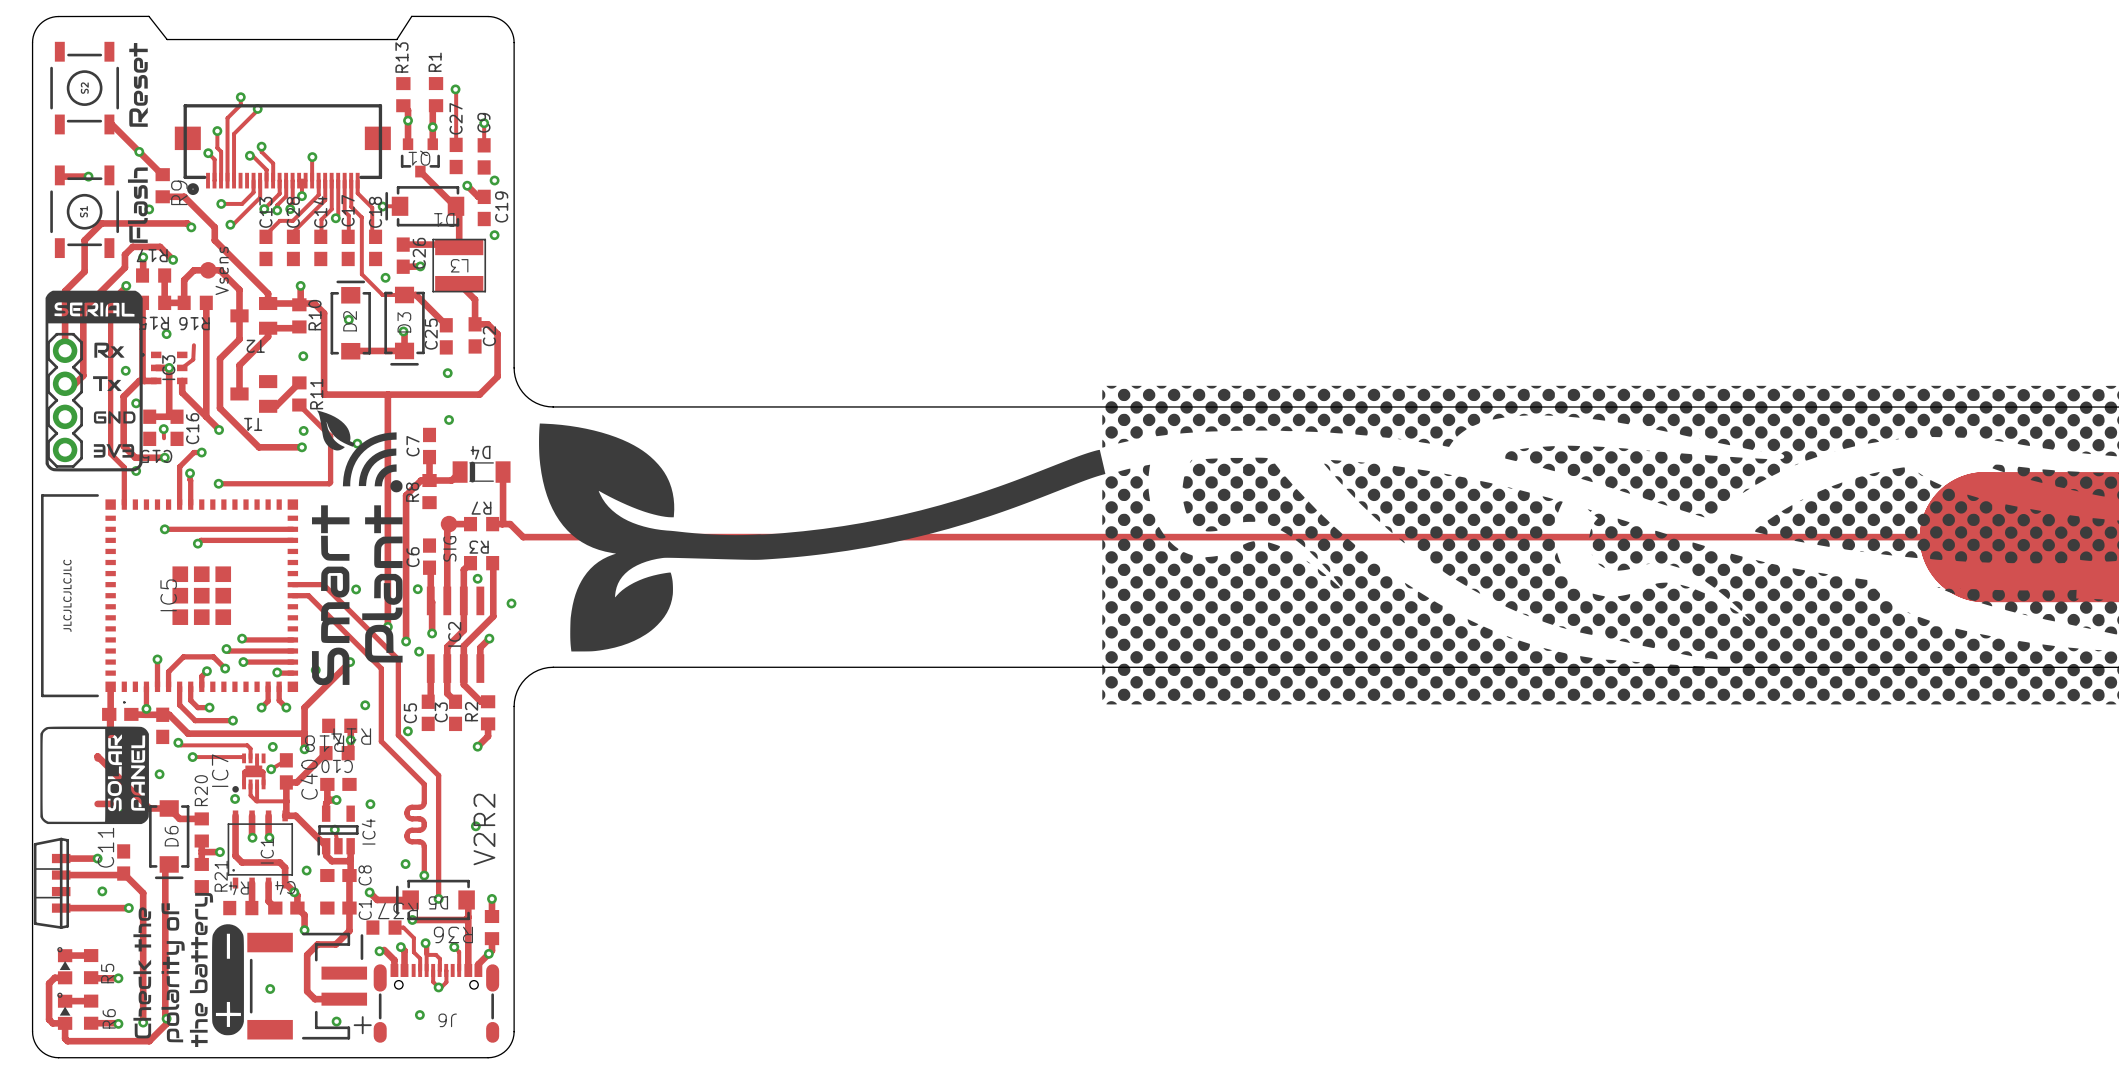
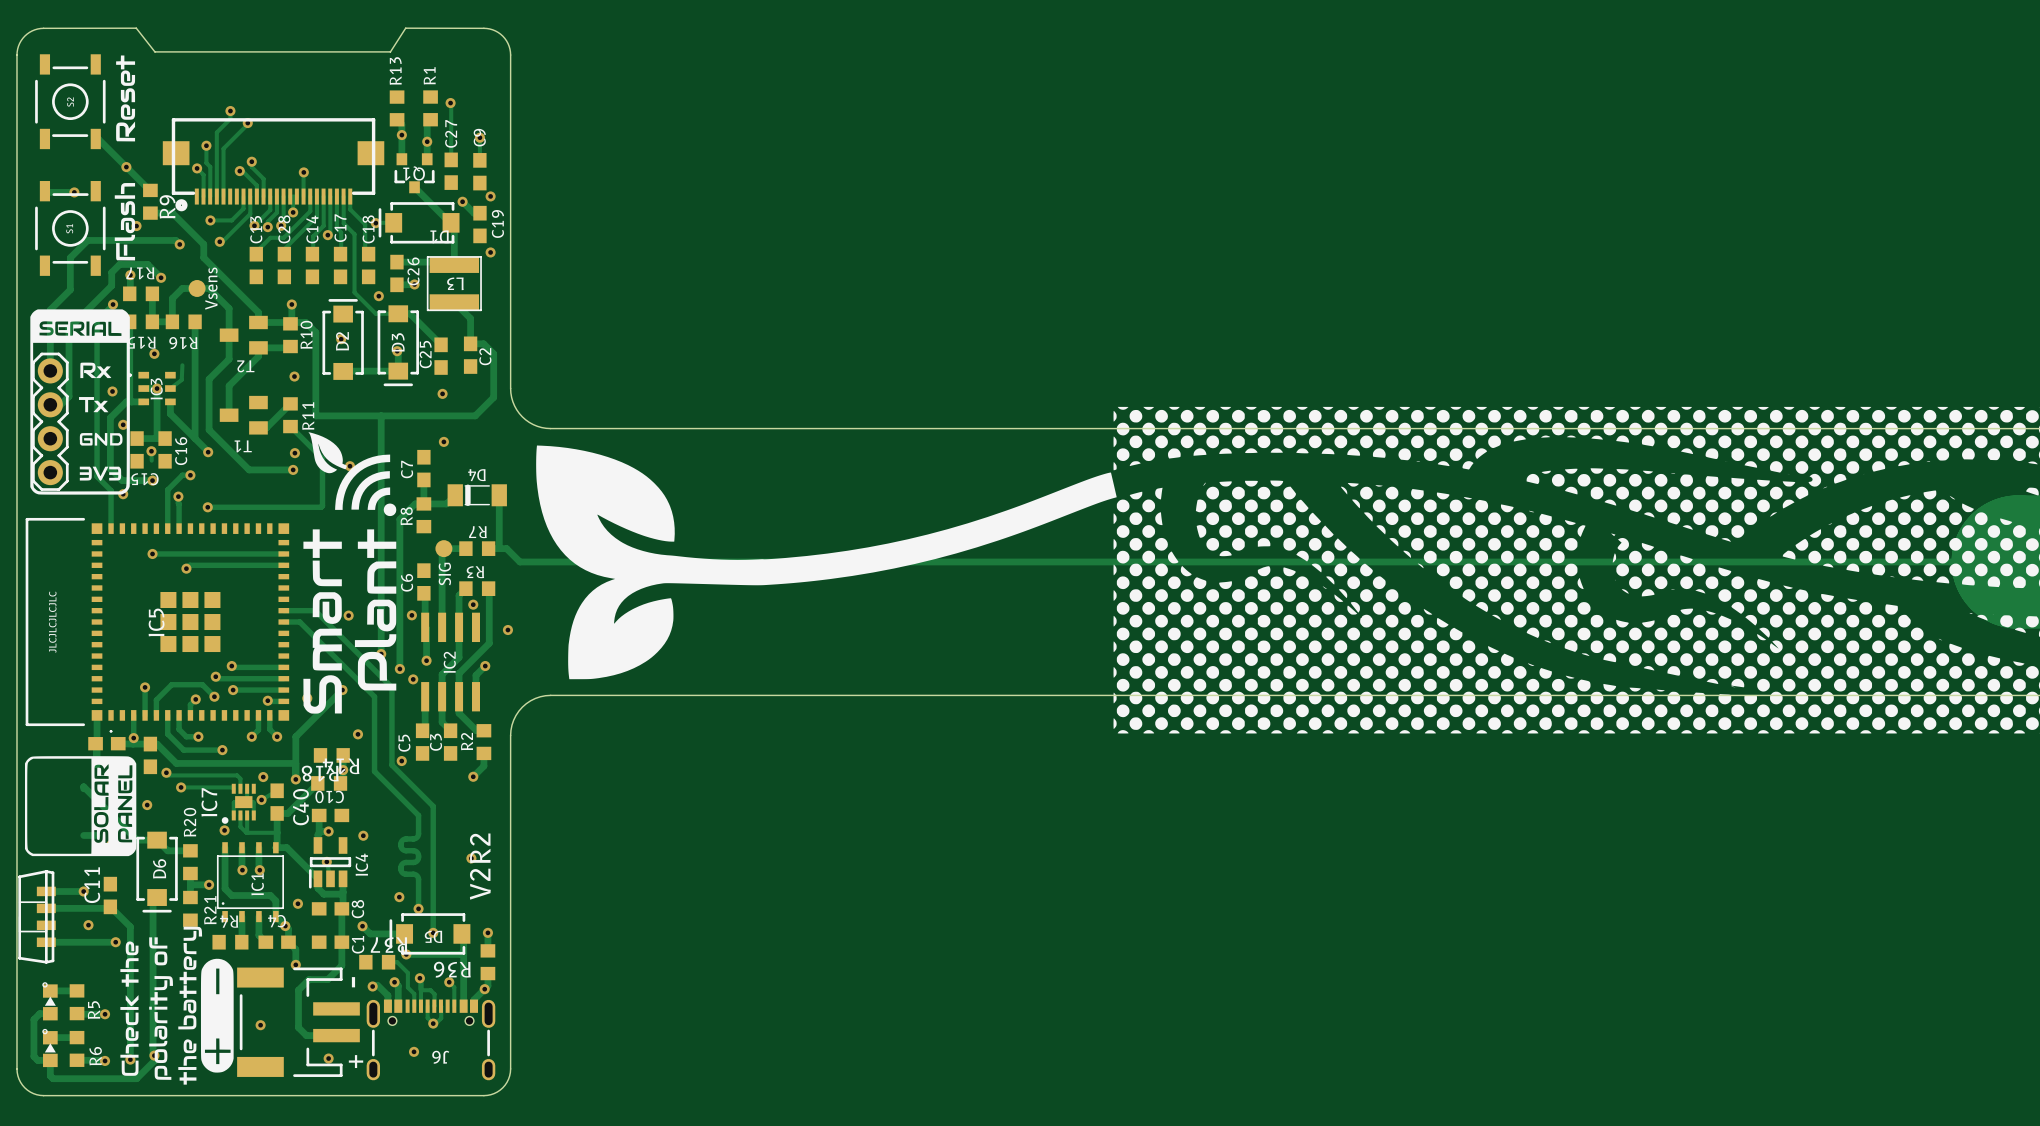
J6 footprint: [373, 963, 500, 1043] -> [366, 999, 496, 1081]

